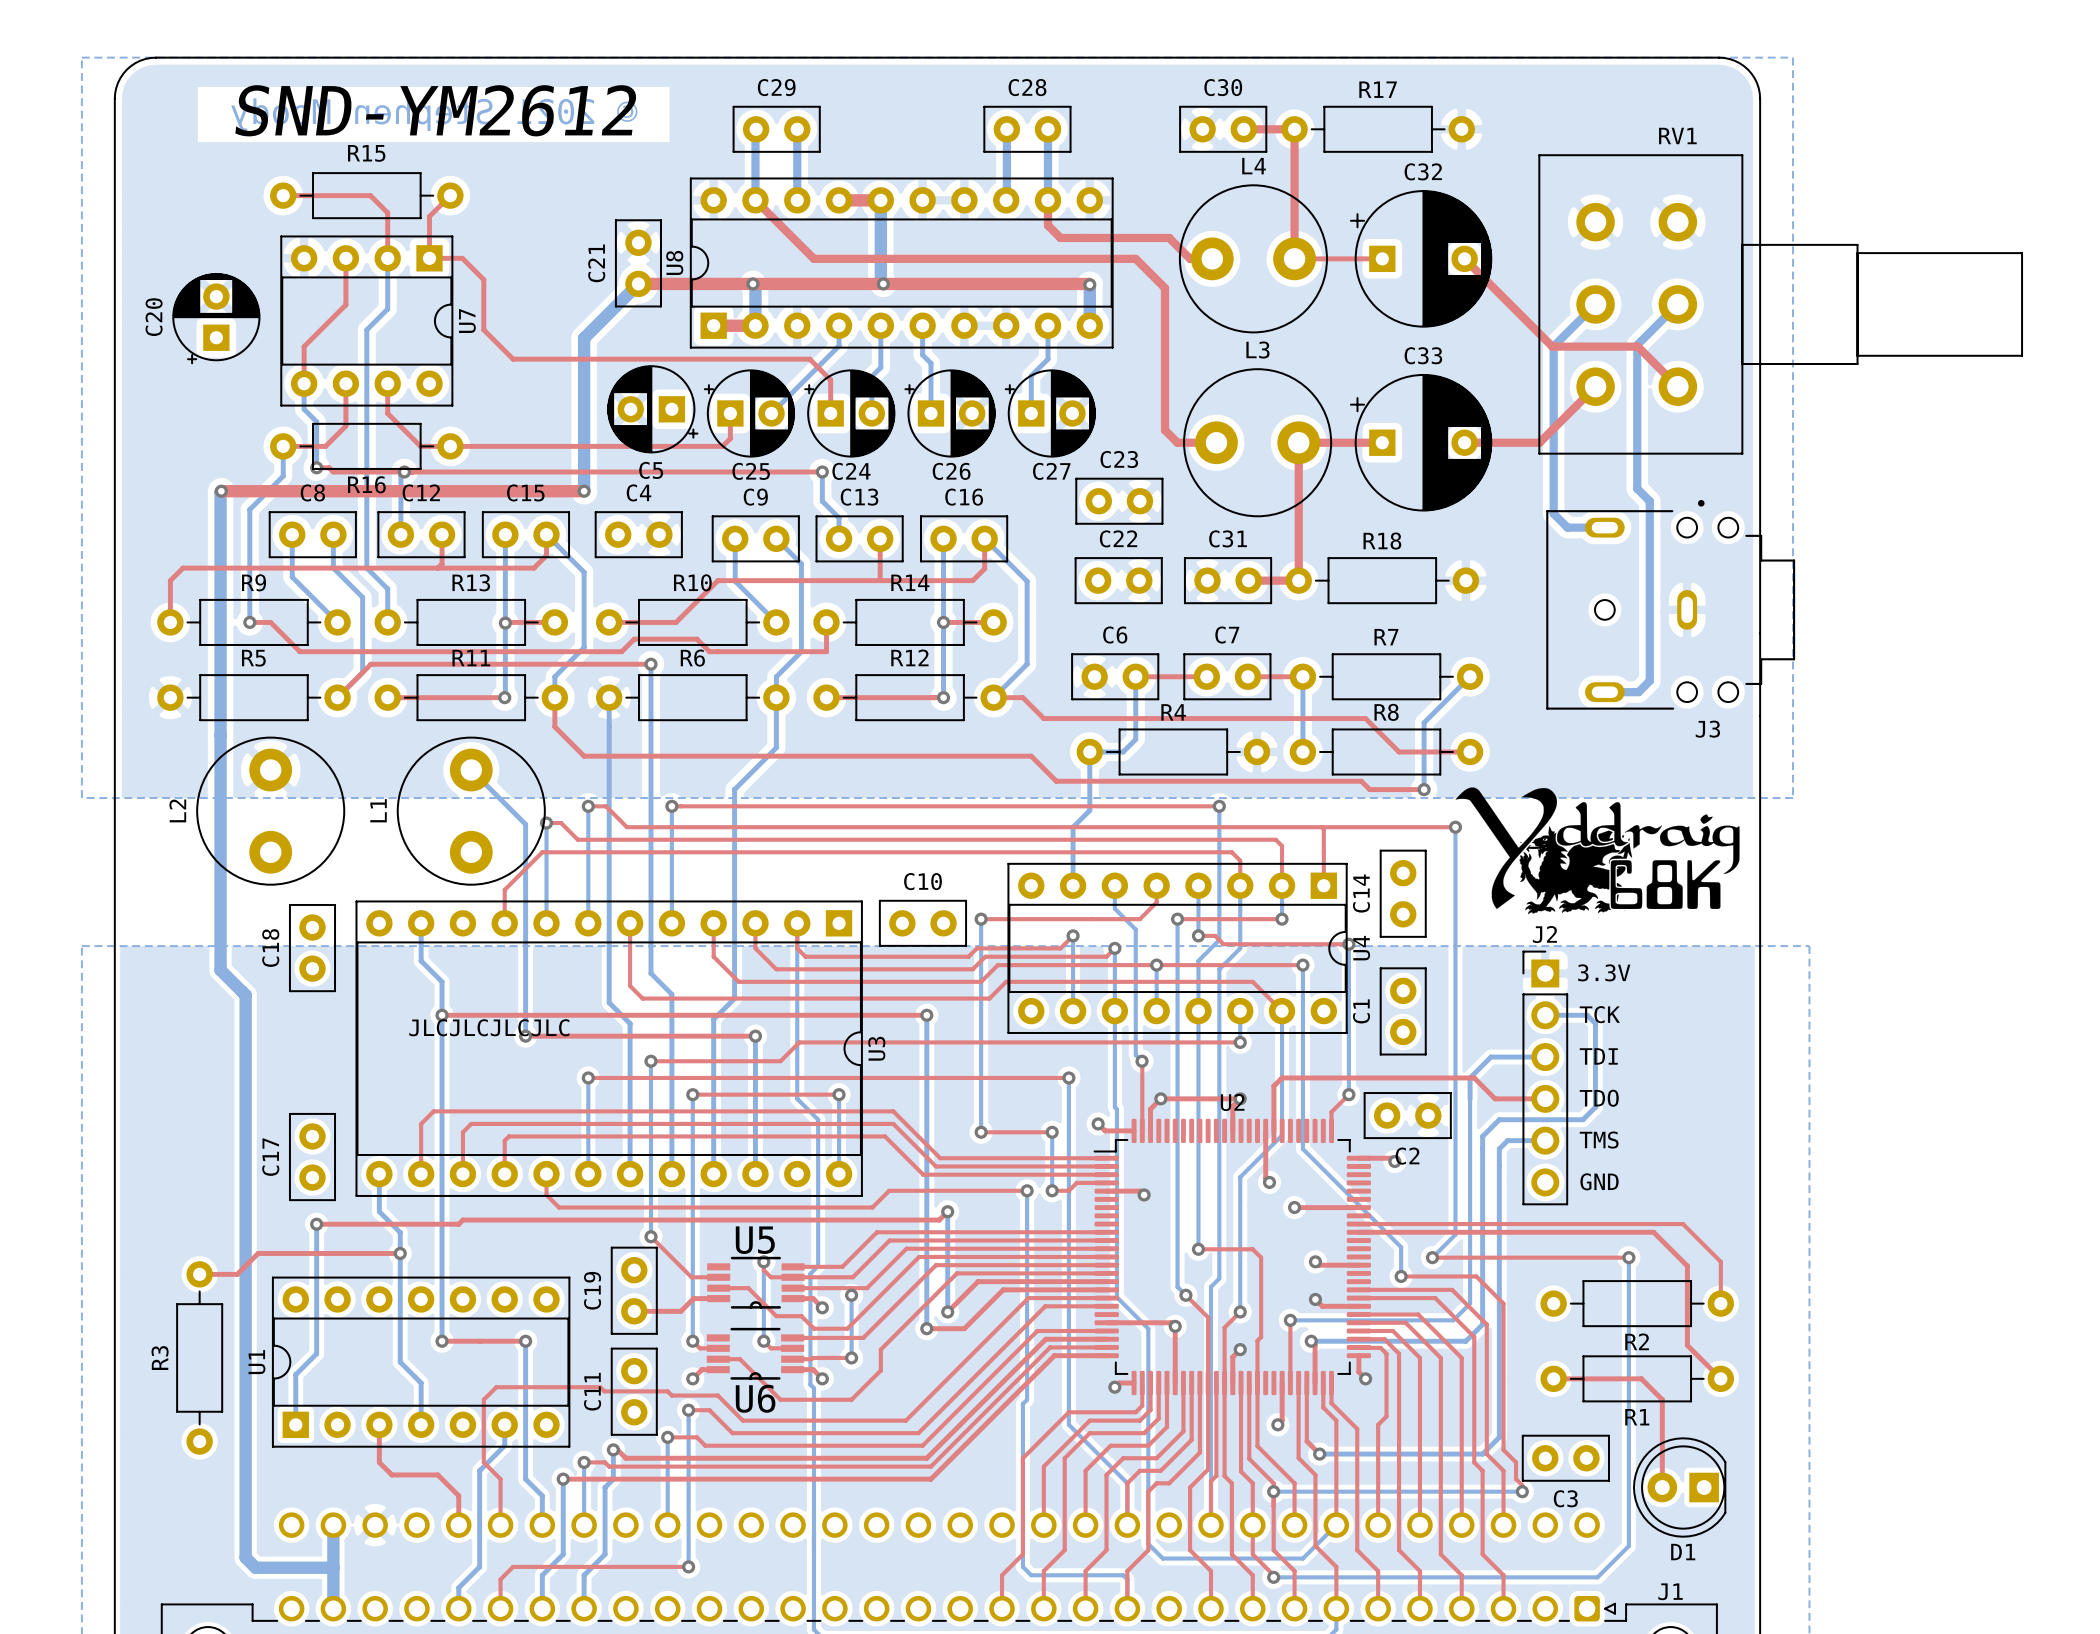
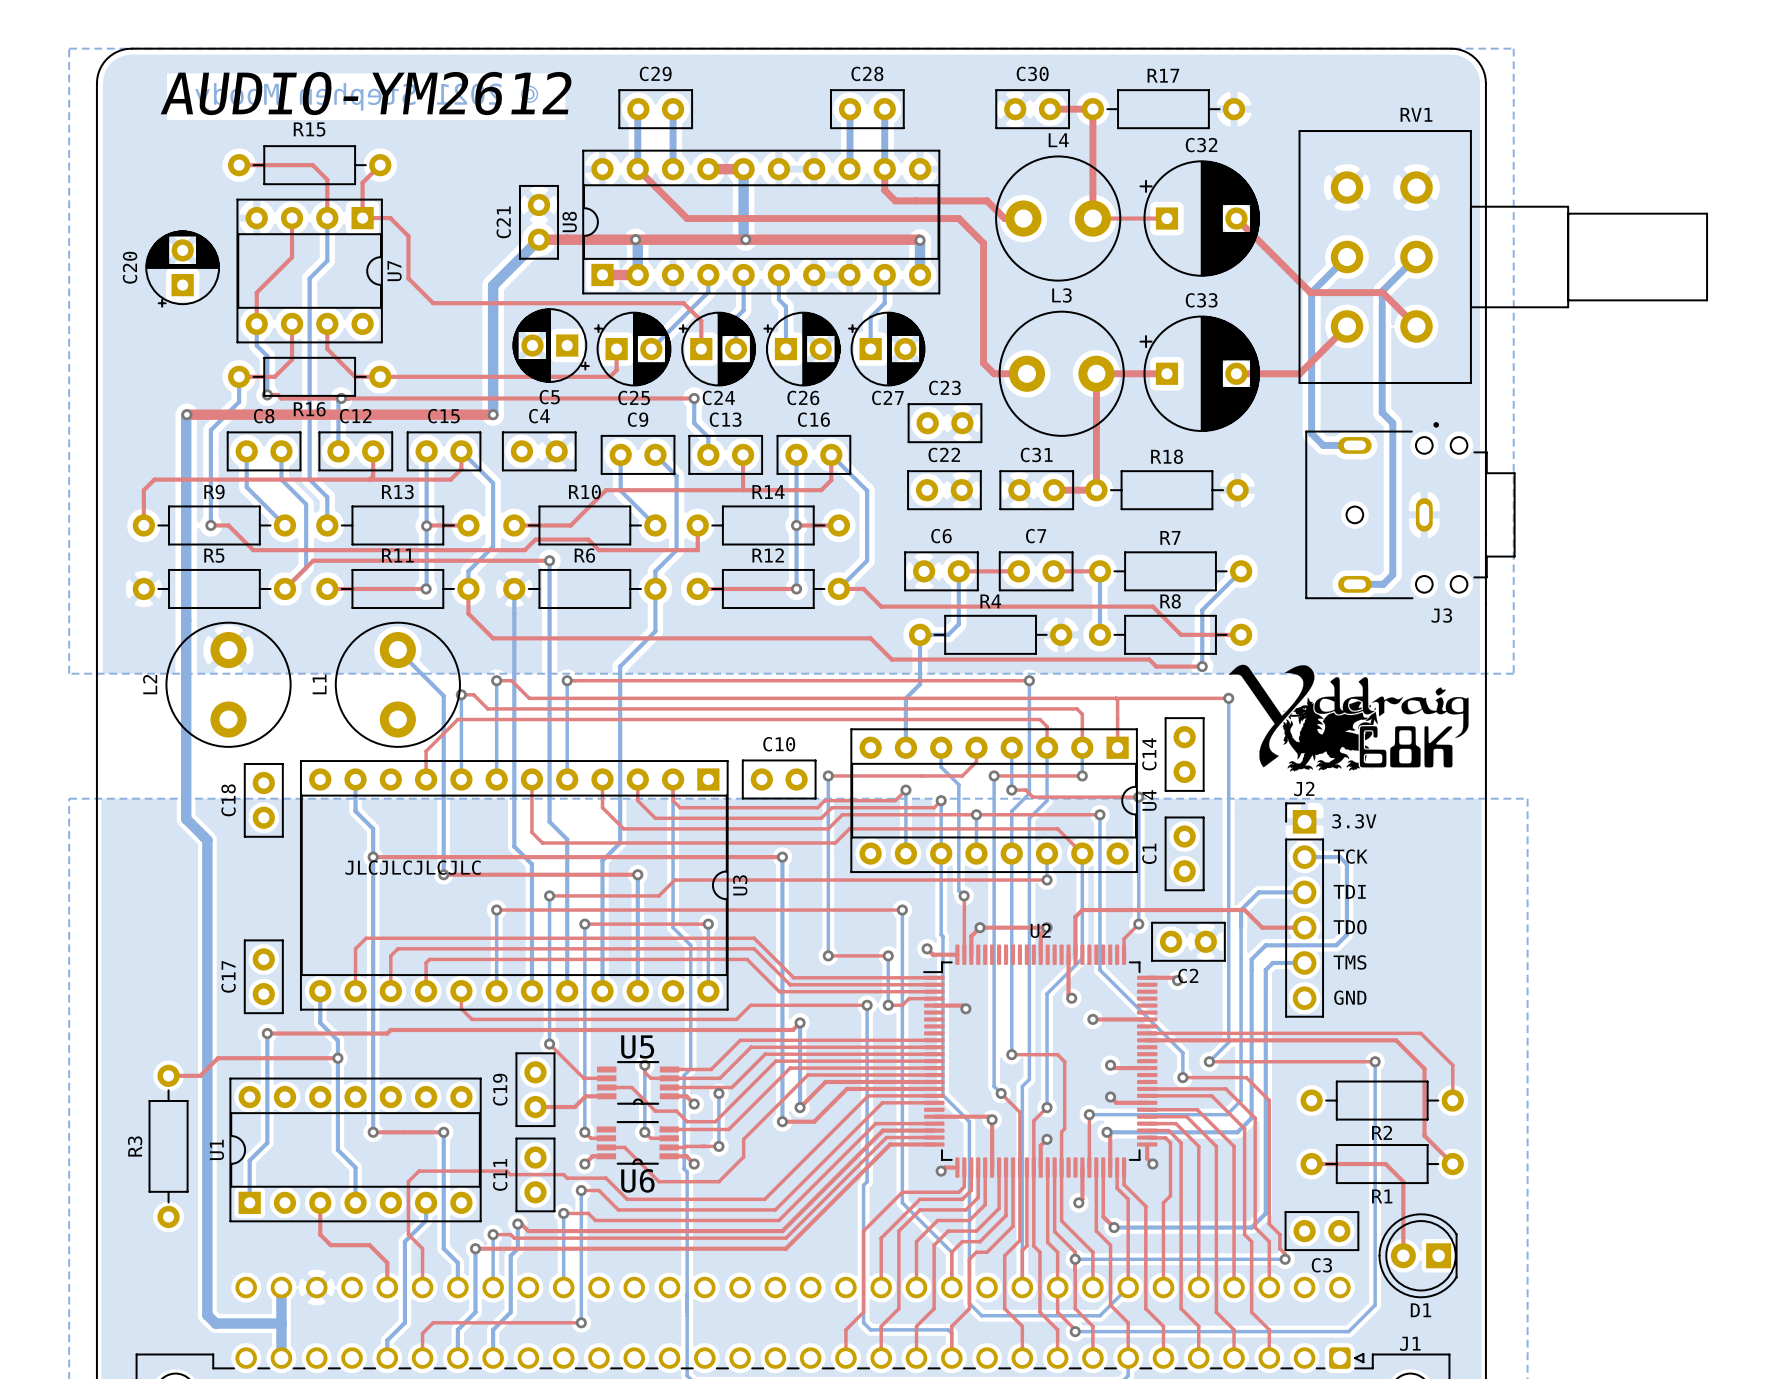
text: SND-YM2612 (436, 110) -> AUDIO-YM2612 (366, 93)

